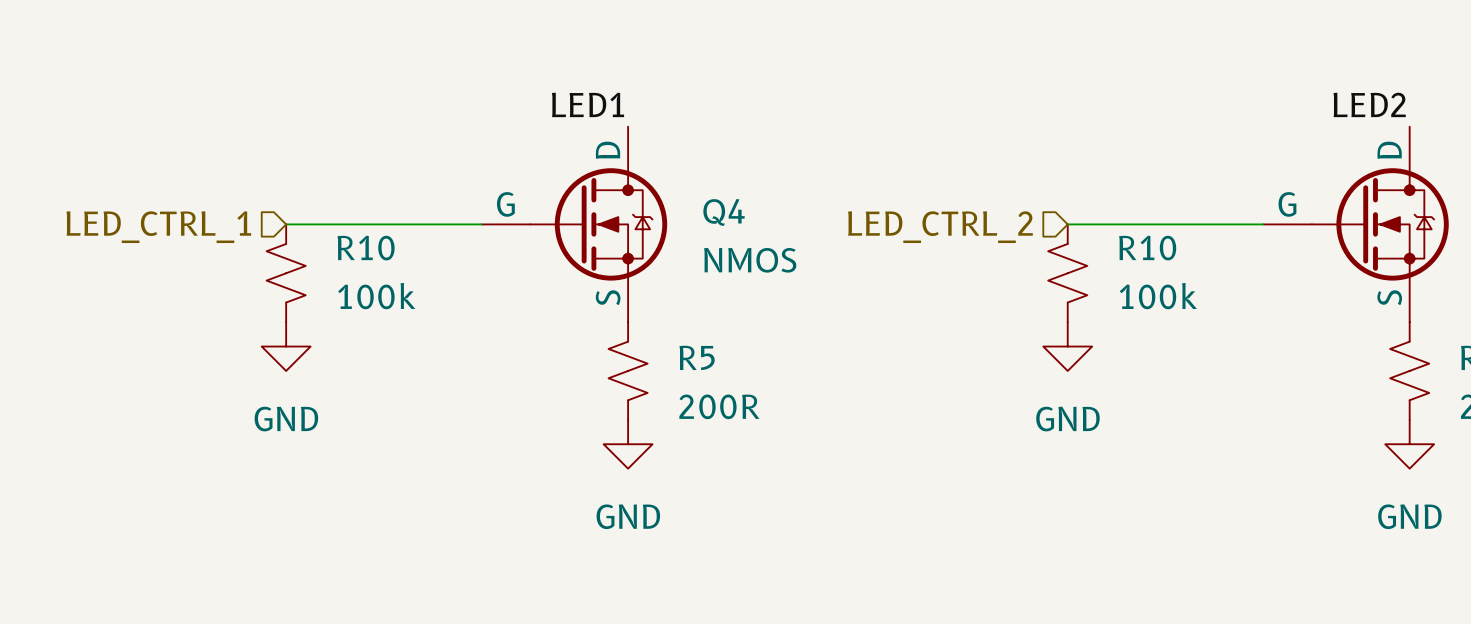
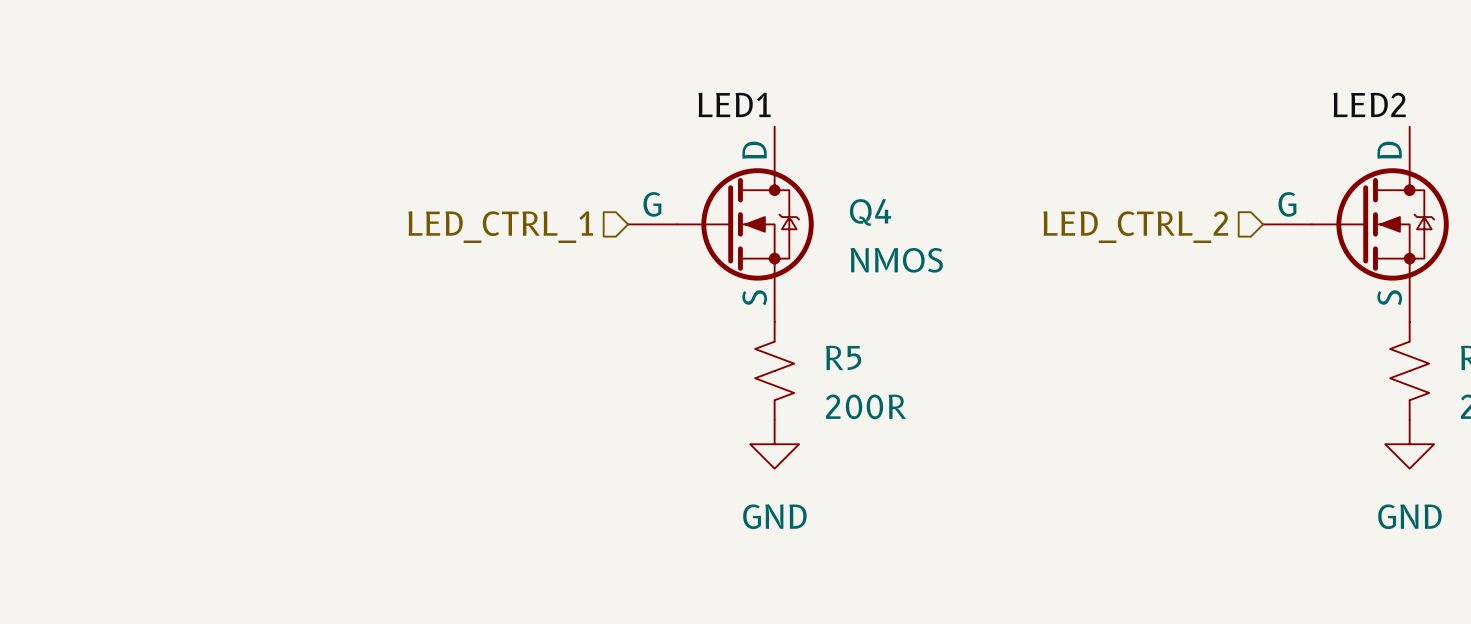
label position: LED1 (588, 104) -> LED1 (734, 104)
wire: (286, 224) (481, 224) -> none
Q4 position: (574, 224) -> (720, 224)
wire: (1067, 224) (1263, 224) -> none
hierarchical label position: LED_CTRL_1 (158, 227) -> LED_CTRL_1 (500, 227)
hierarchical label position: LED_CTRL_2 (940, 227) -> LED_CTRL_2 (1135, 227)
R10: 100k (286, 273) -> none
R10: 100k (1067, 273) -> none
power symbol: GND (286, 346) -> none
power symbol: GND (1067, 346) -> none
R5 position: (628, 370) -> (774, 370)
power symbol position: GND (628, 444) -> GND (774, 444)

